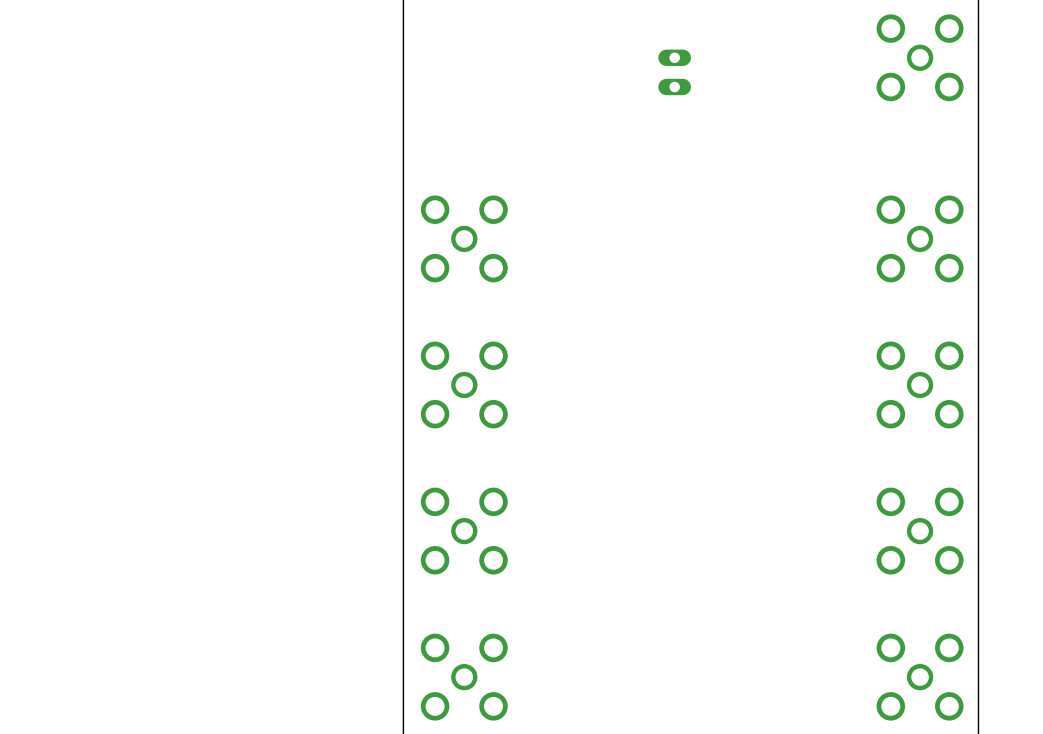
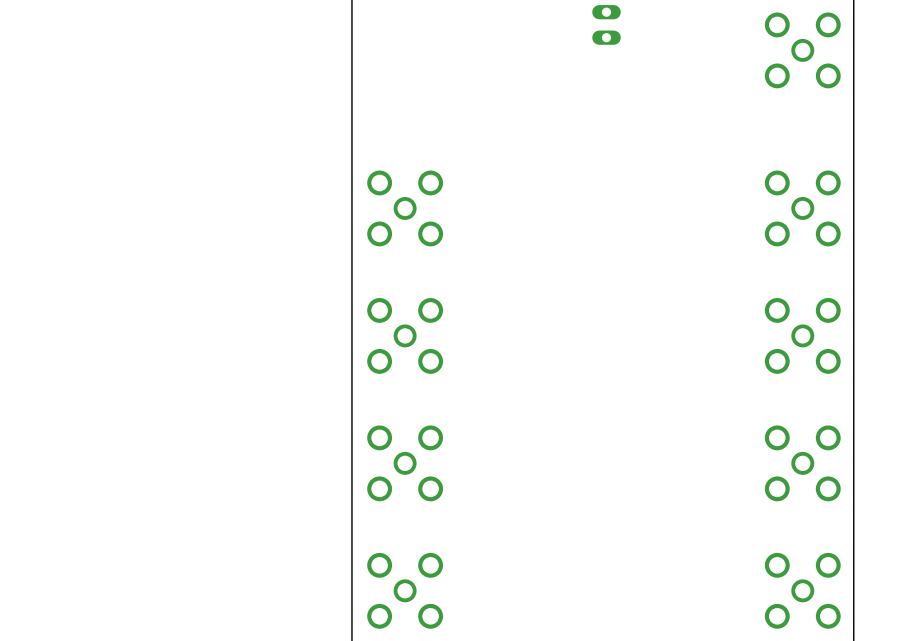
part position: (674, 72) -> (606, 24)

